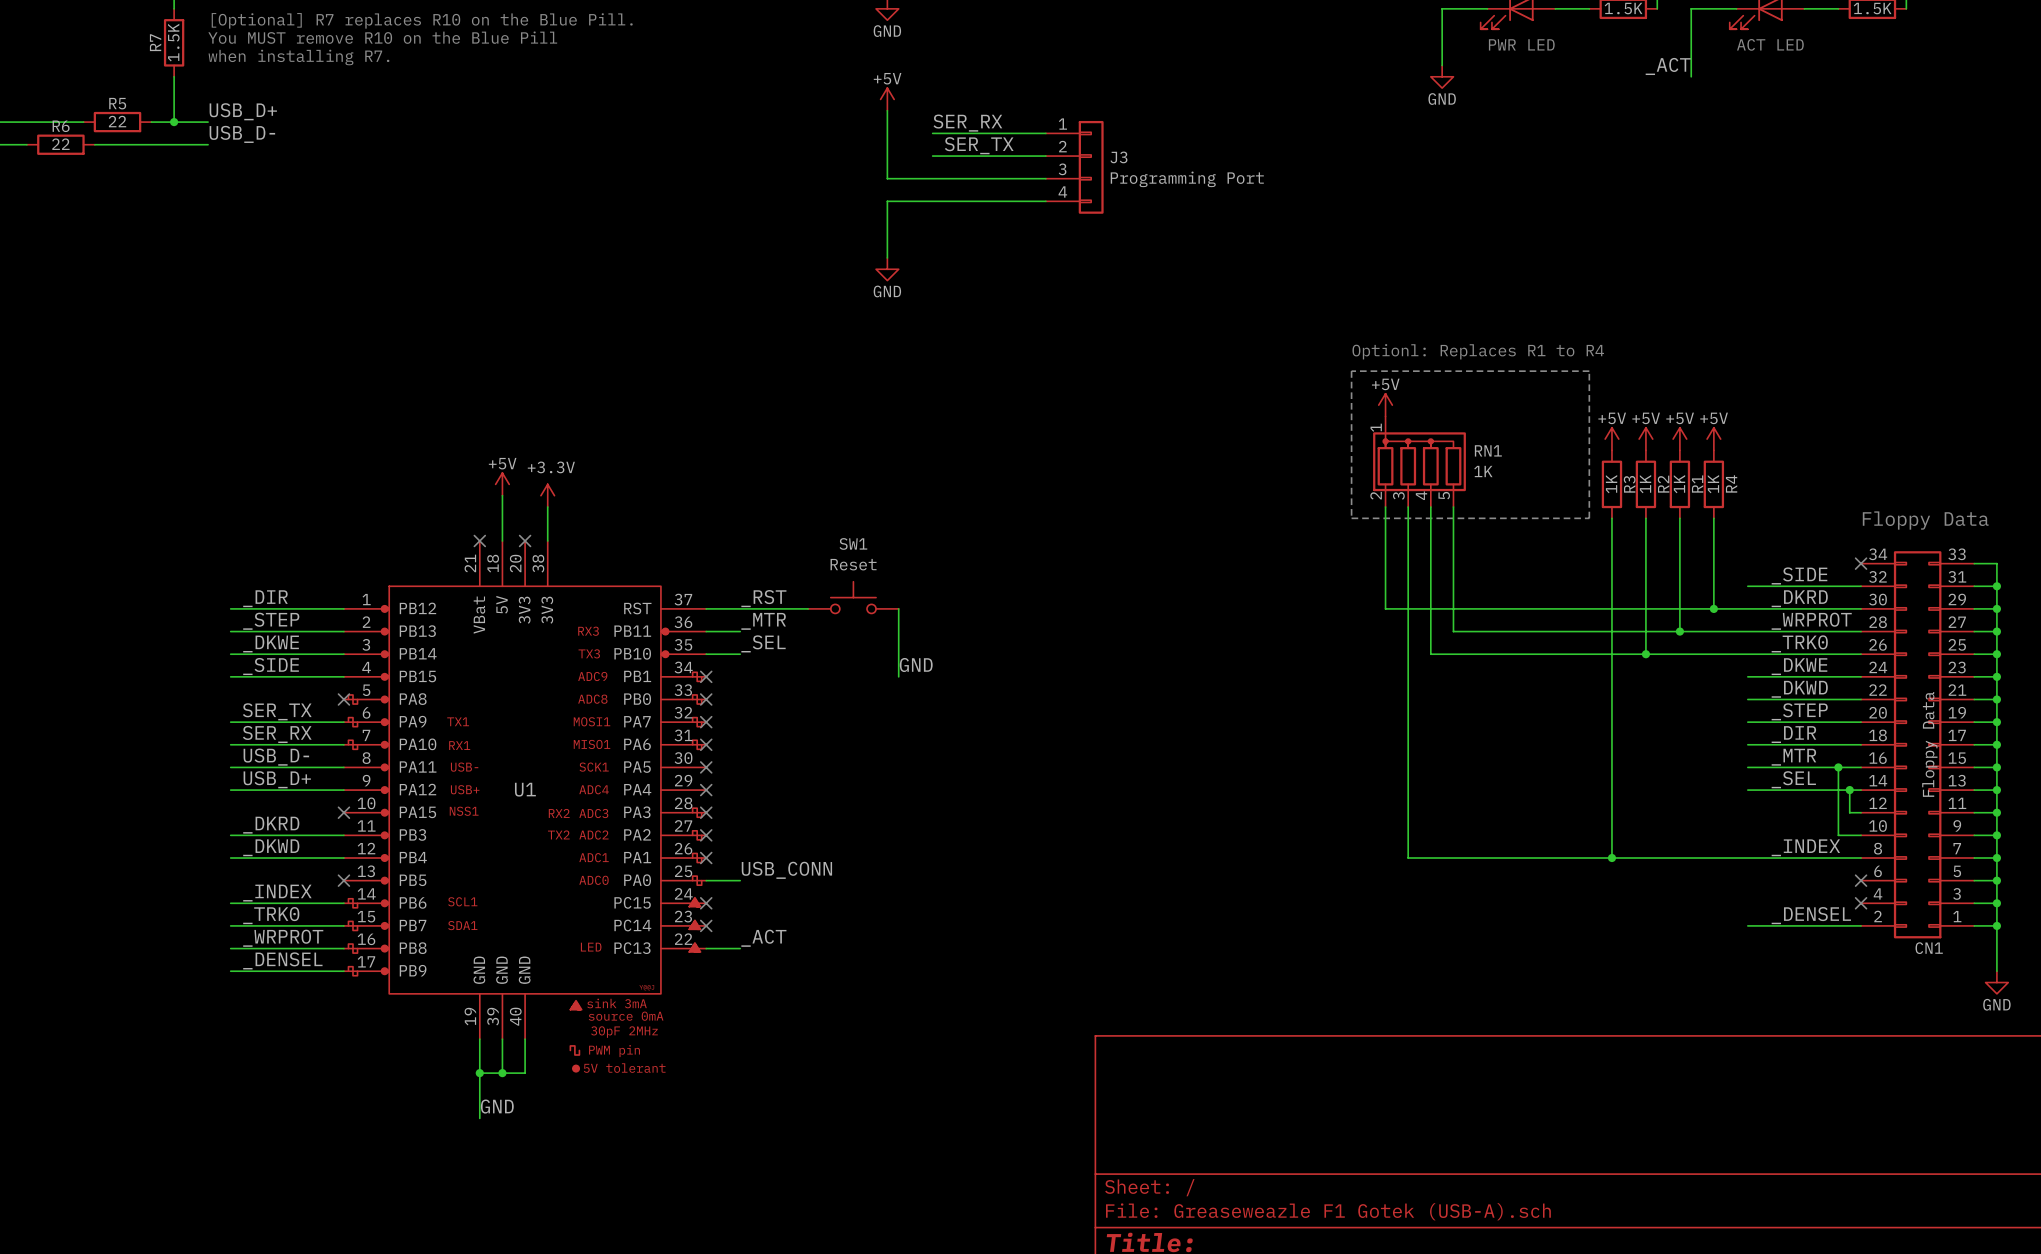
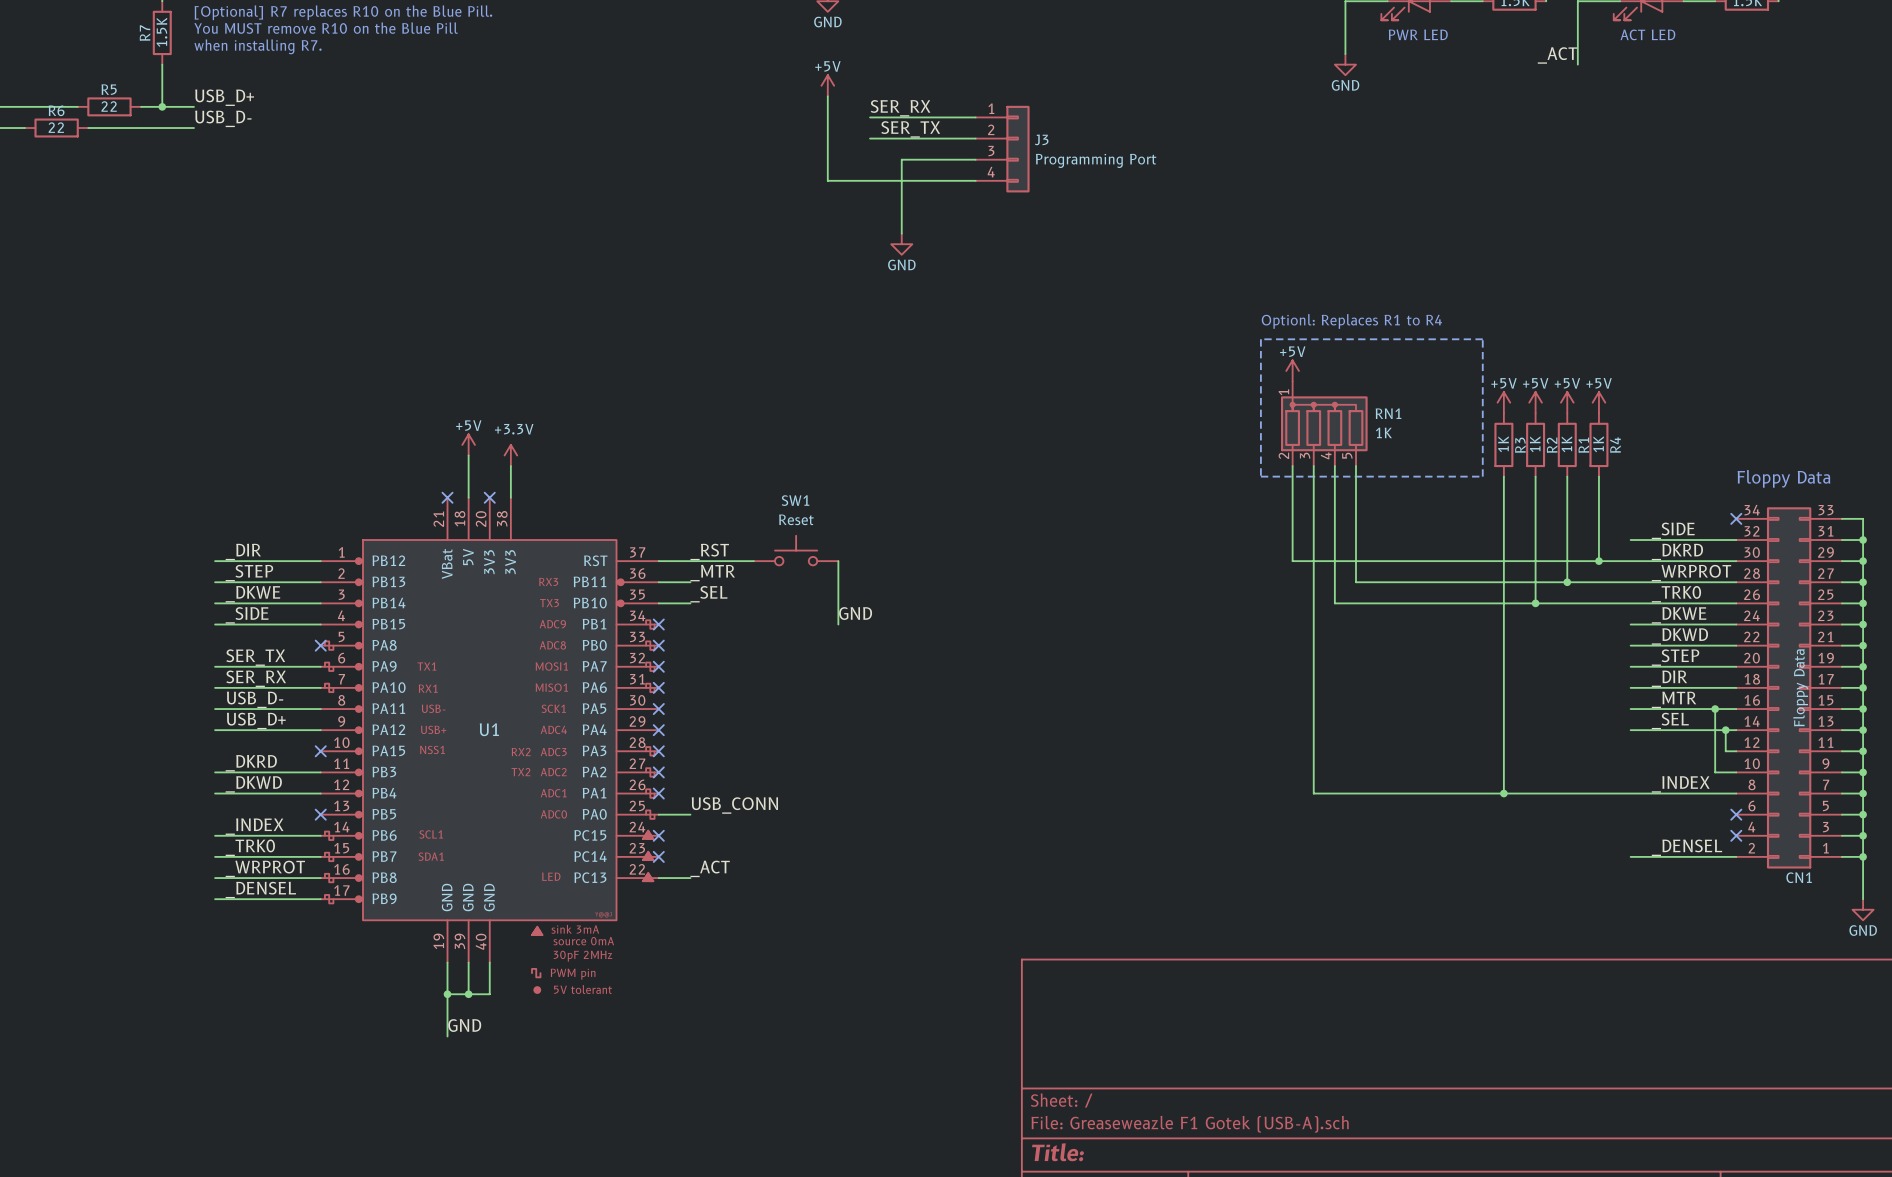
wire: (887, 178) (966, 178) -> (901, 233) (901, 159)
wire: (887, 201) (887, 257) -> (827, 180) (827, 159)
power symbol position: GND (887, 269) -> GND (901, 244)

